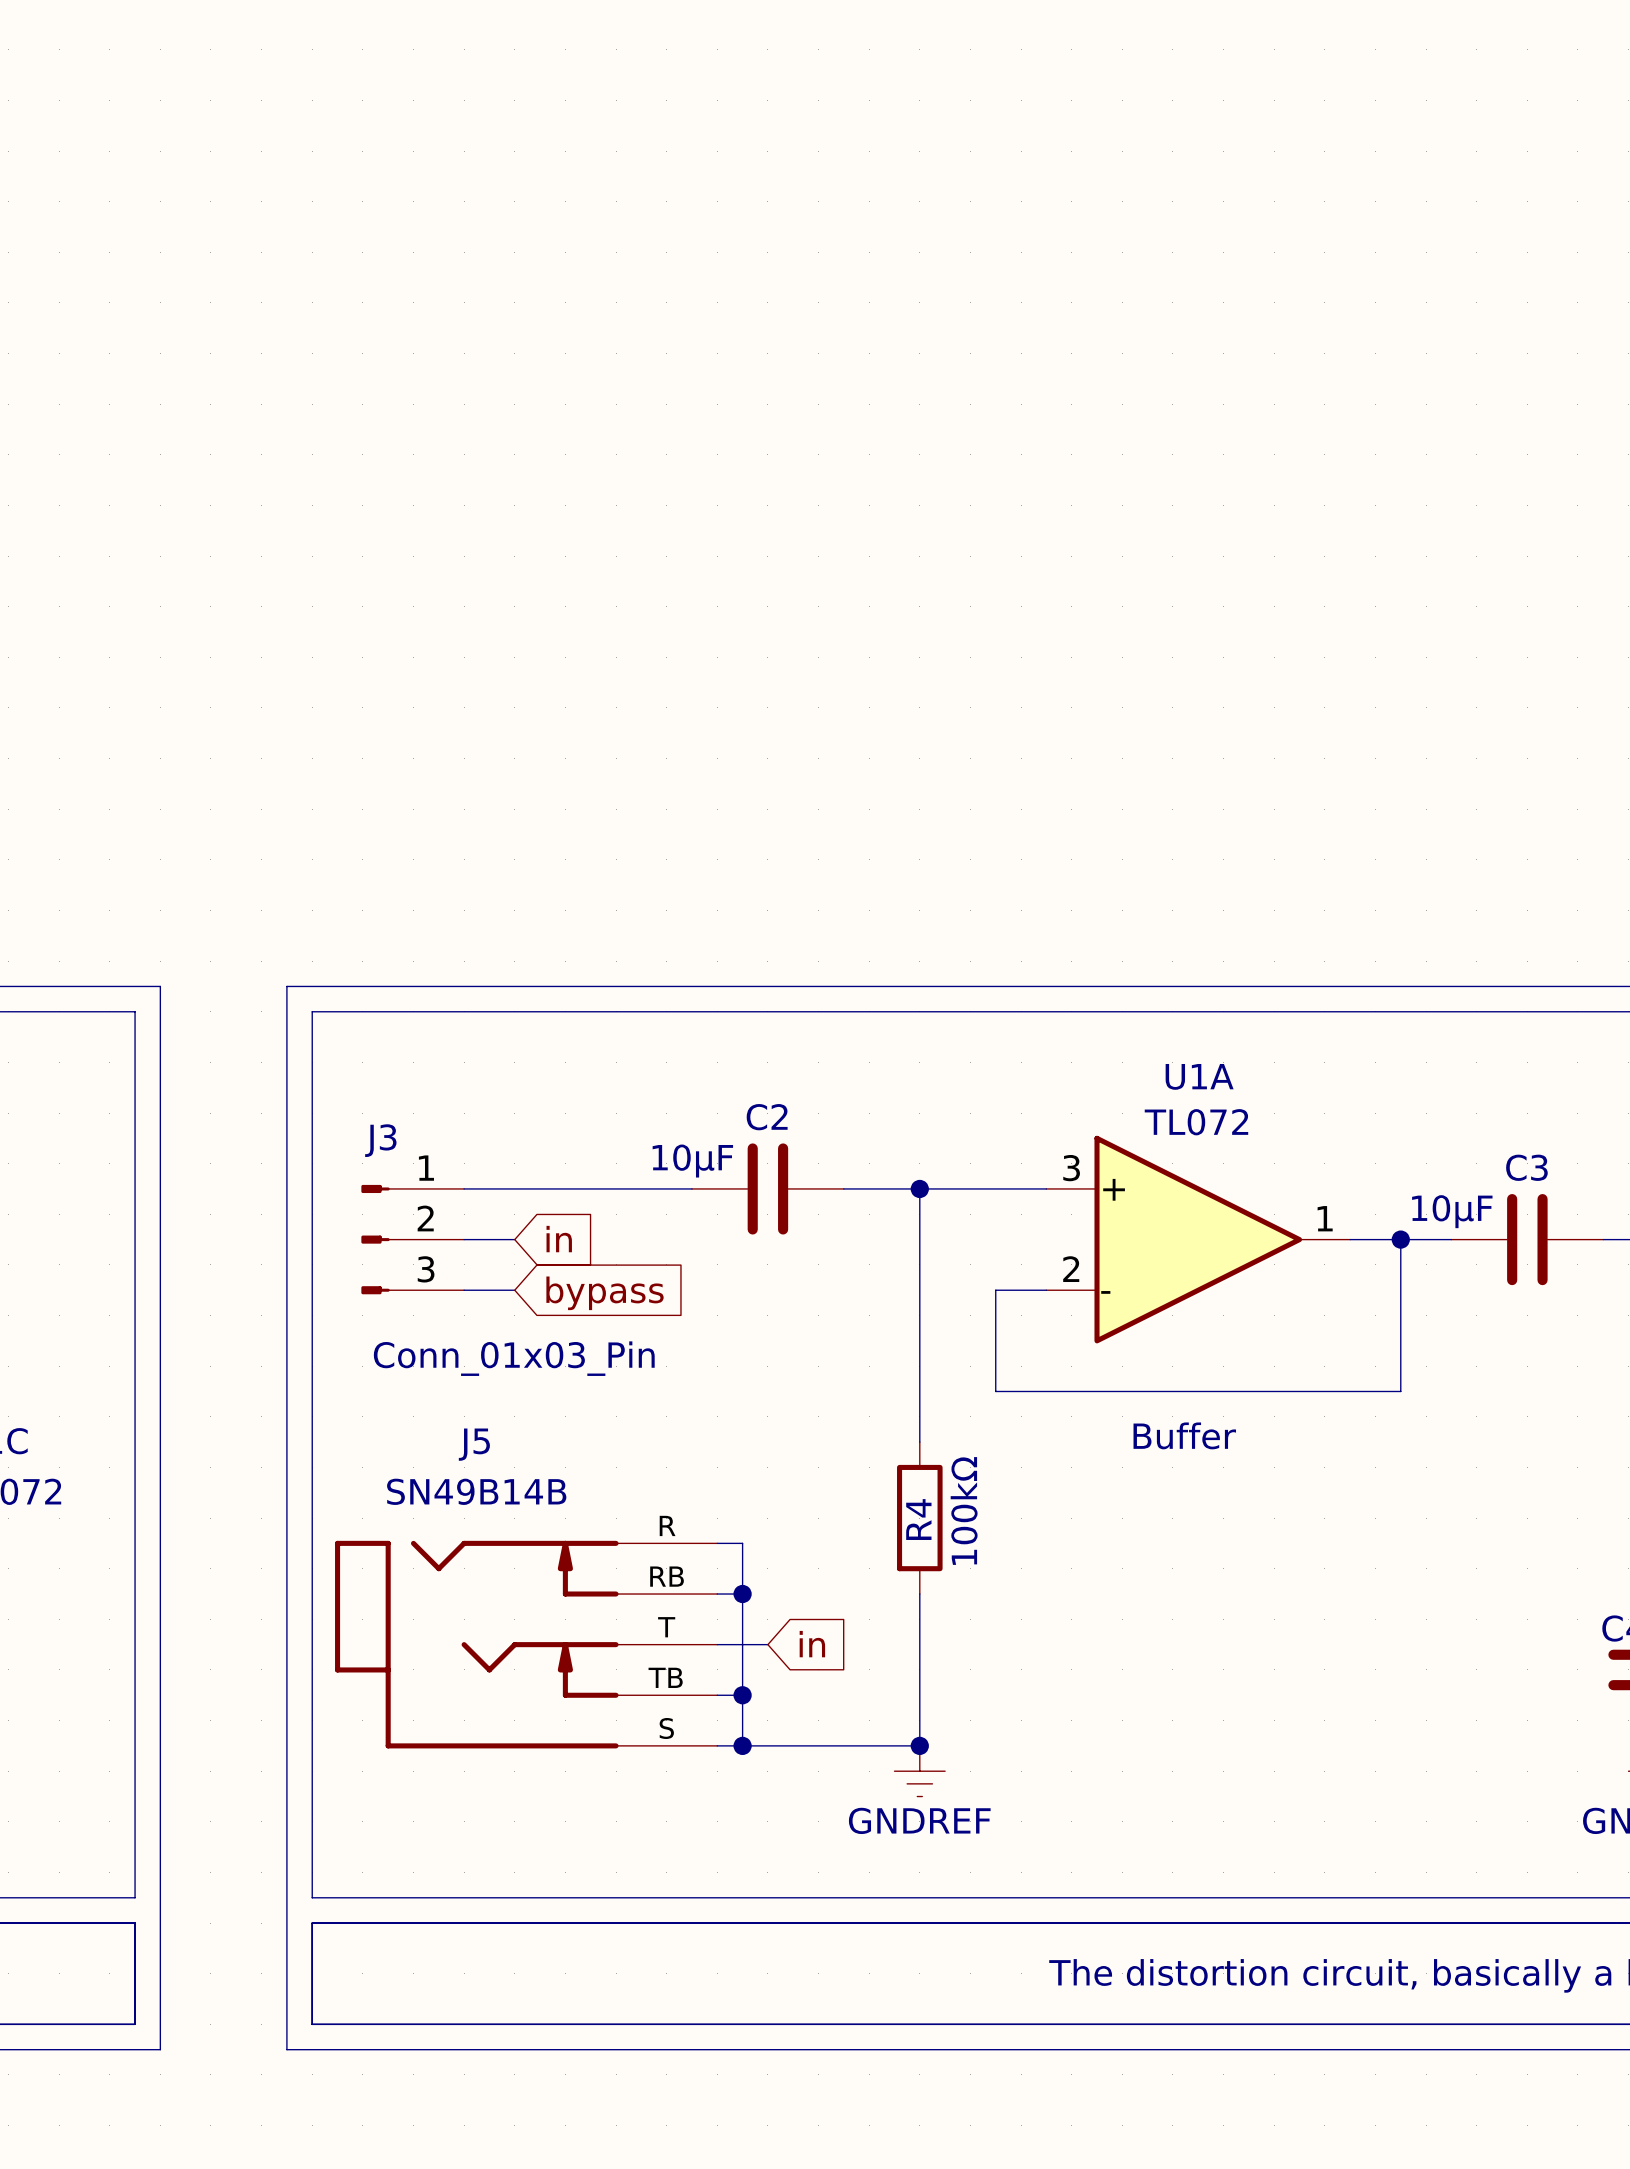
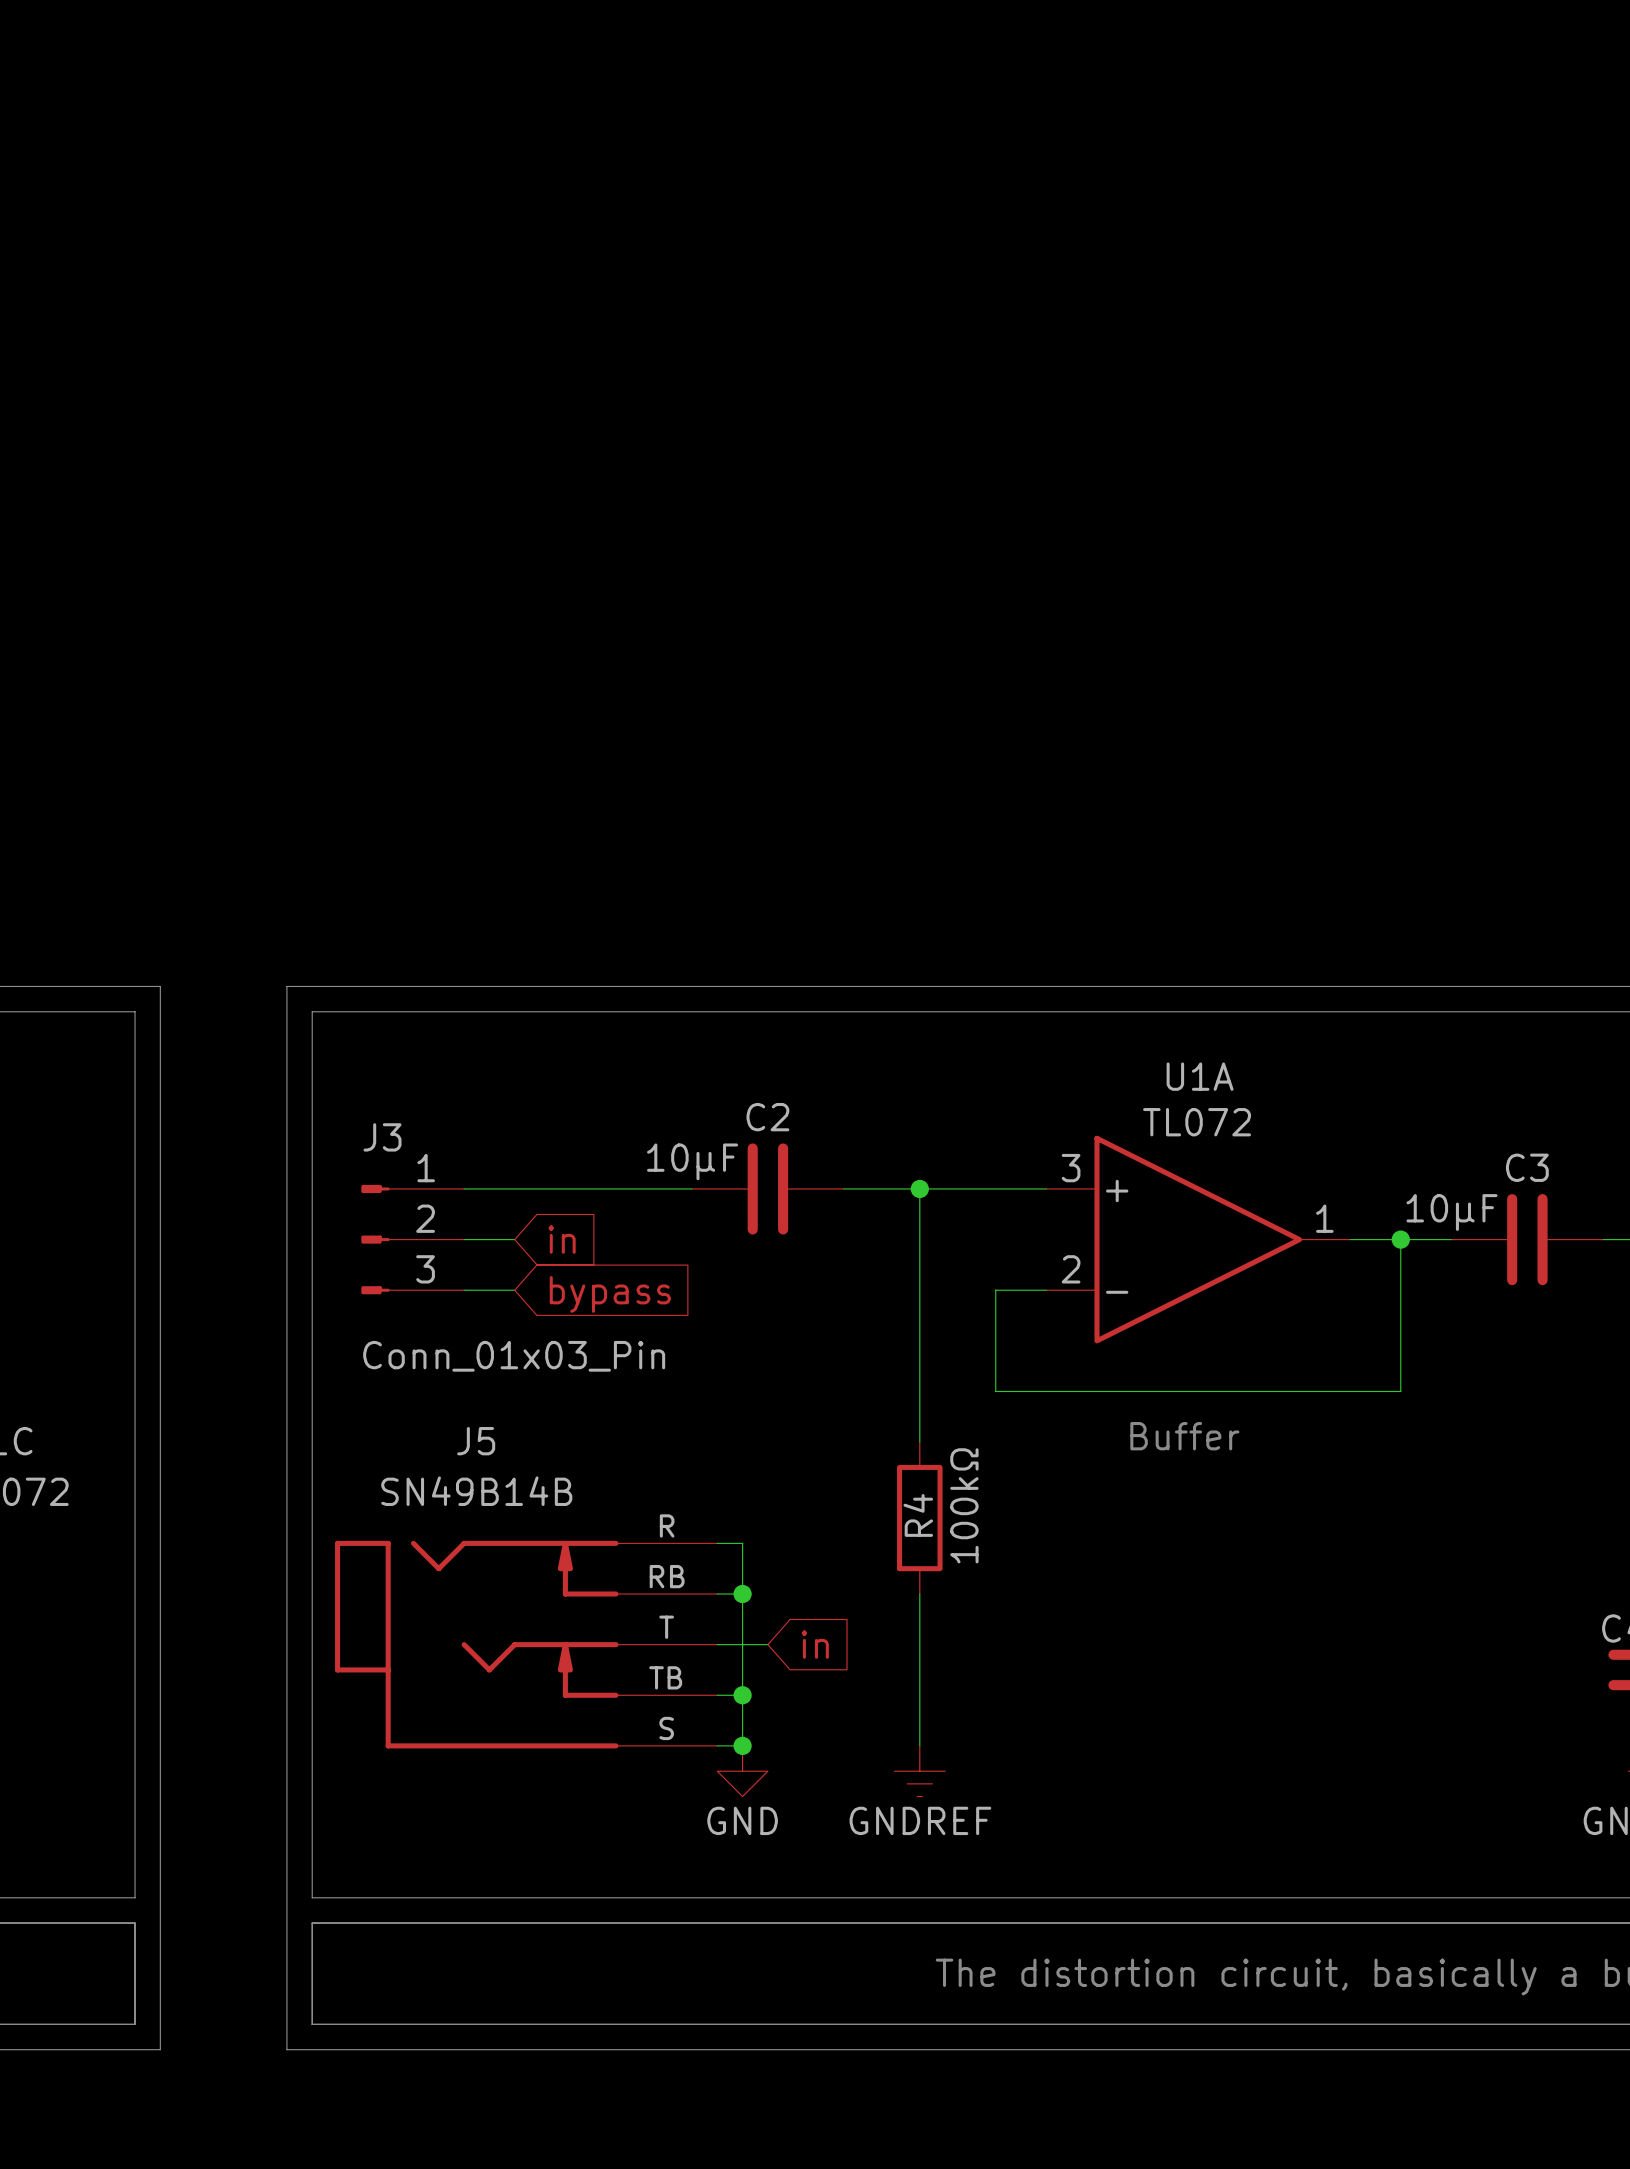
wire: (742, 1745) (919, 1745) -> none
junction: (919, 1745) -> none
power symbol: none -> GND (742, 1771)

